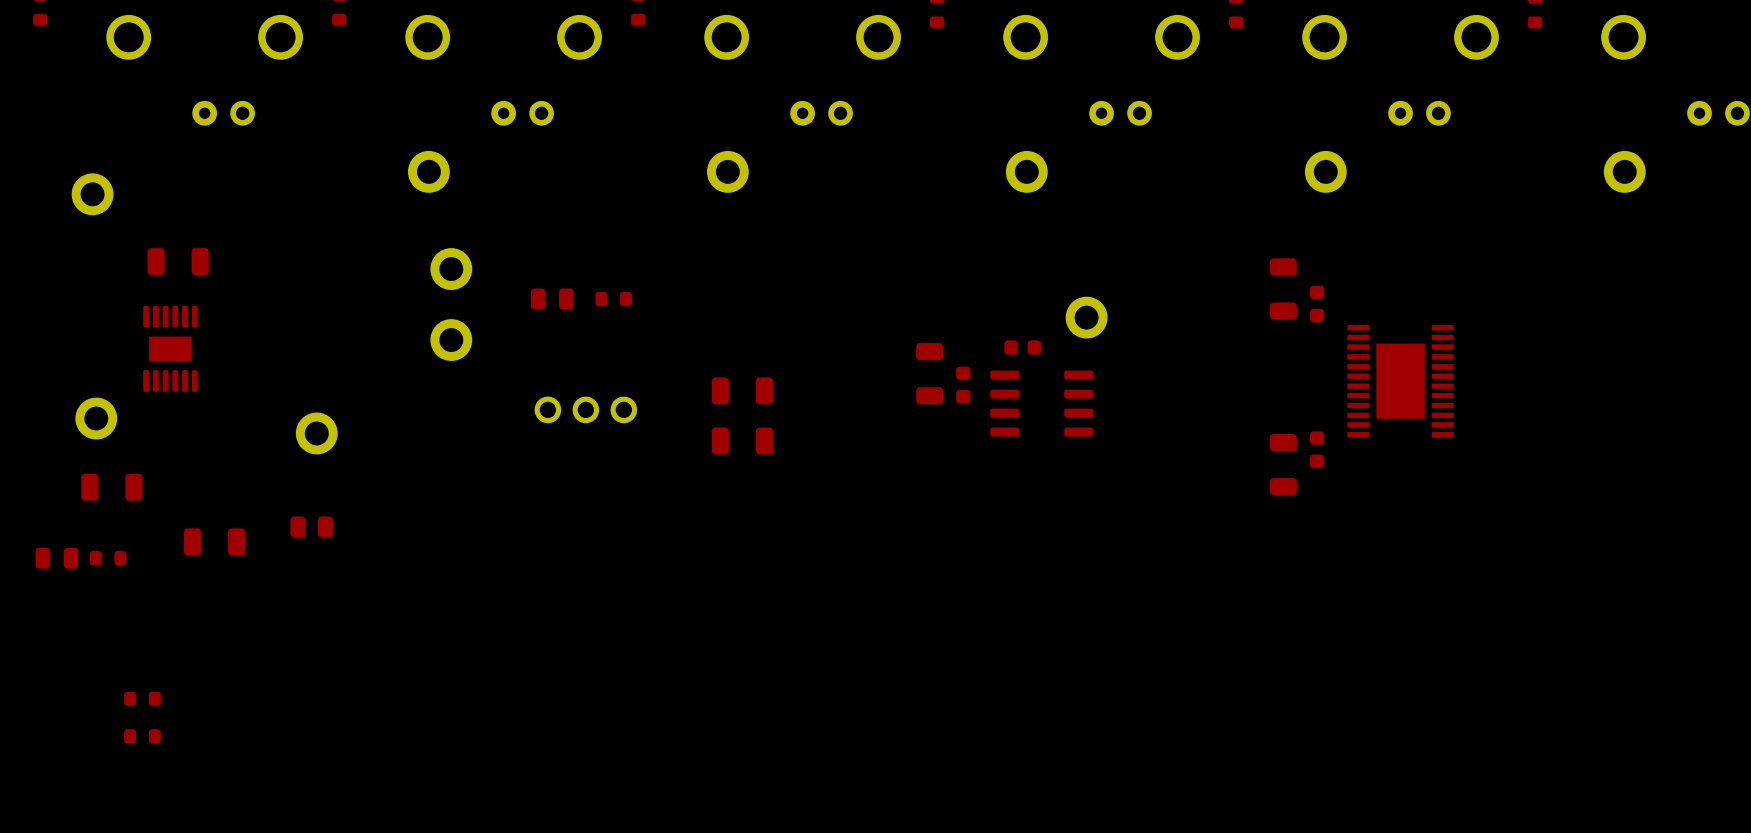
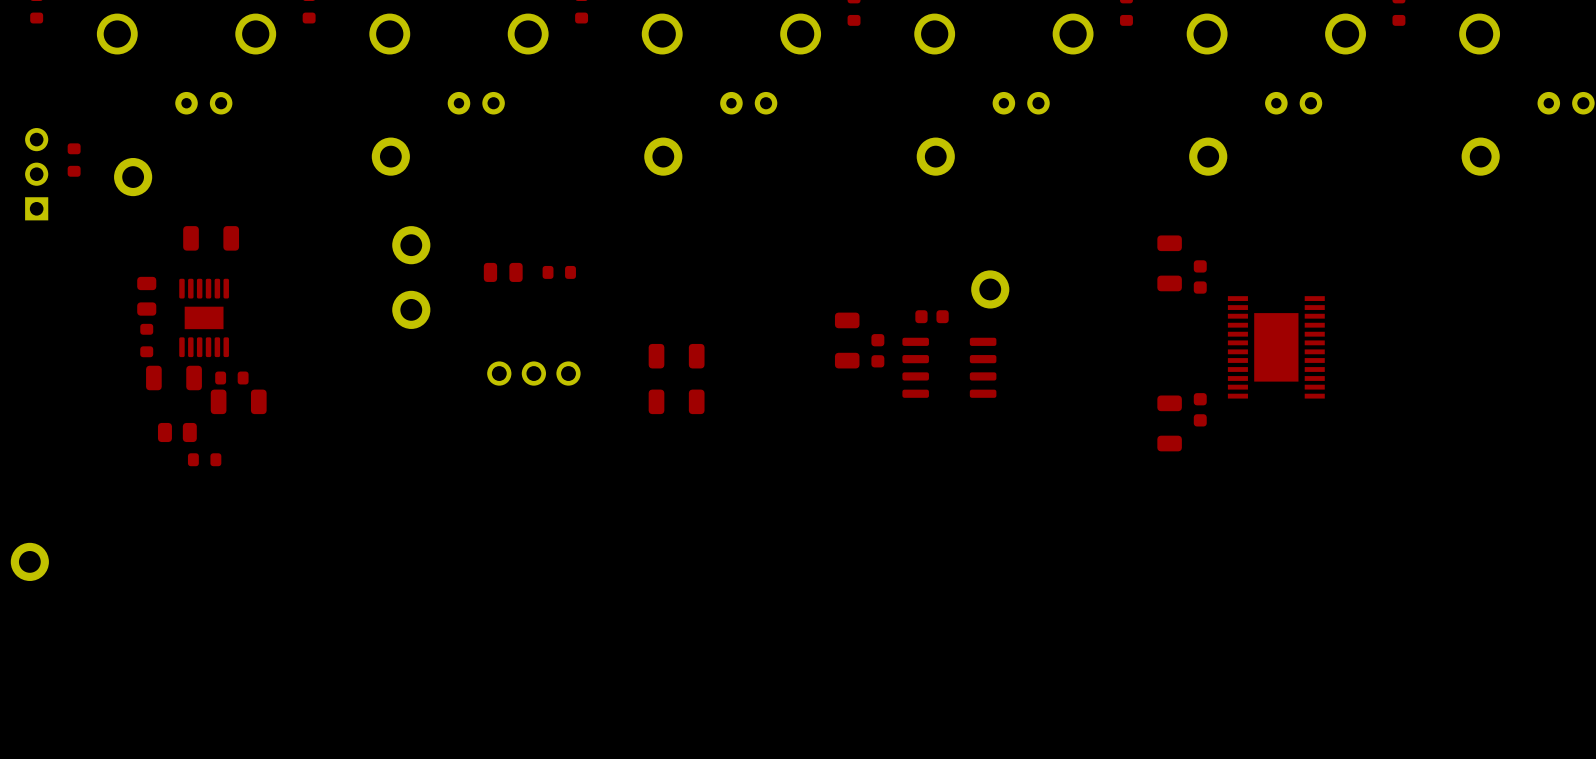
part: none -> (74, 160)
part: none -> (36, 174)
part position: (92, 194) -> (133, 177)
part position: (178, 261) -> (211, 238)
part position: (170, 348) -> (204, 317)
part: none -> (146, 340)
part: none -> (173, 378)
part: none -> (231, 378)
part: (96, 418) -> none
part: (316, 433) -> none
part: none -> (238, 401)
part: (111, 487) -> none
part: none -> (204, 459)
part position: (311, 526) -> (177, 432)
part: (214, 541) -> none
part rotation: 0° (56, 558) -> 90° clockwise (146, 296)
part position: (56, 558) -> (146, 296)
part: (108, 558) -> none
part: none -> (29, 561)
part: (142, 698) -> none
part: (142, 736) -> none

